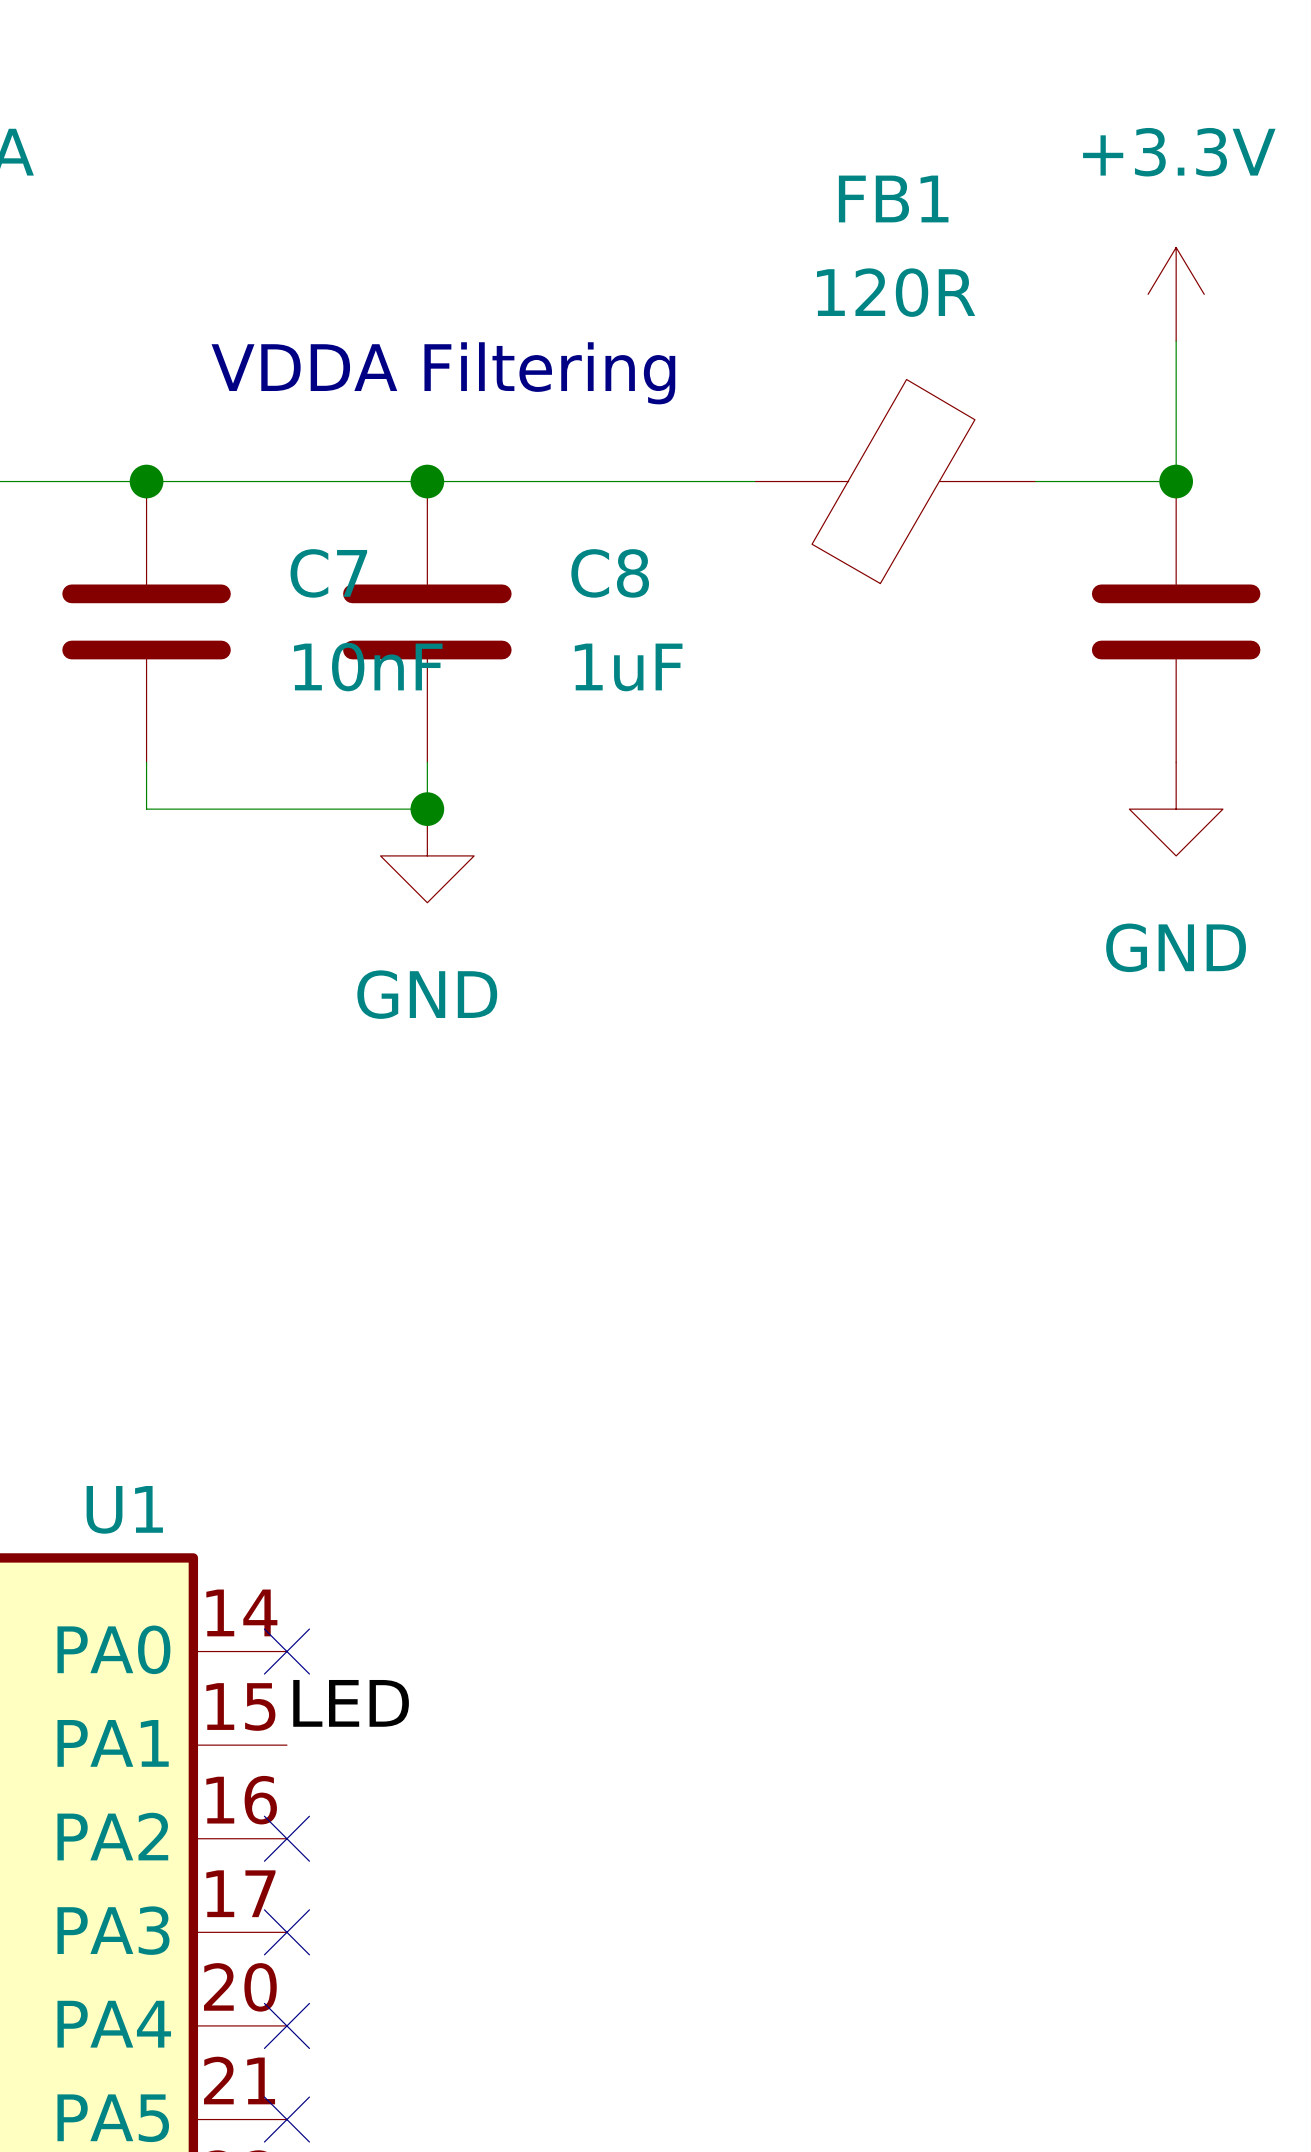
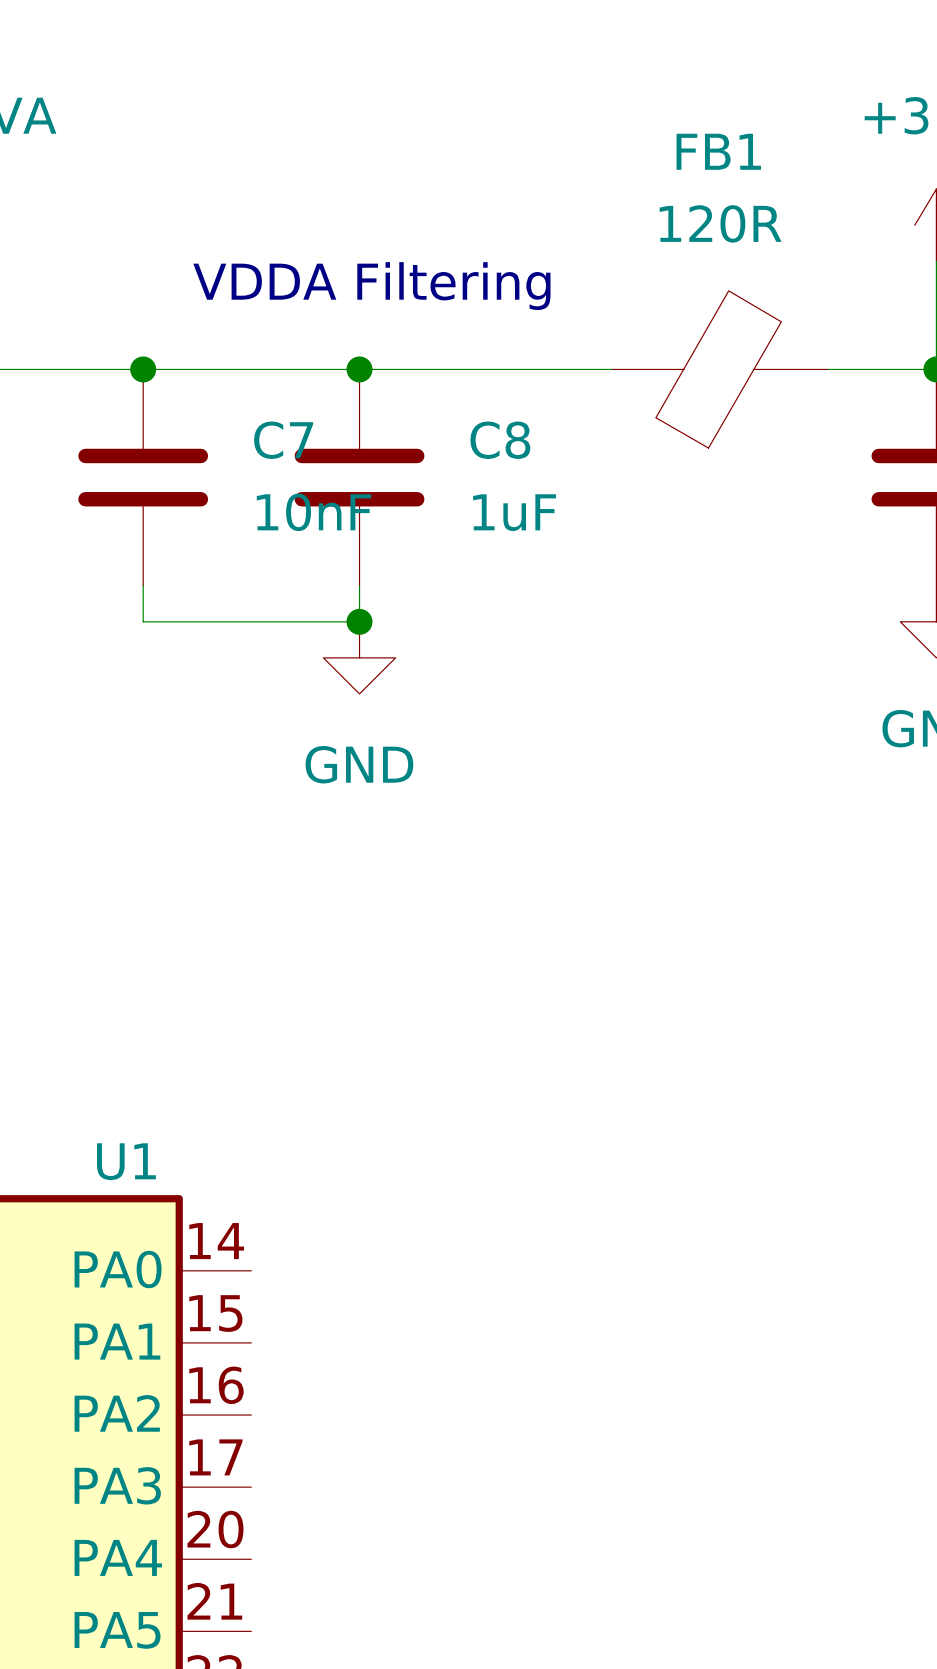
no-connect mark: (286, 1651) -> none
label: LED (351, 1703) -> none
no-connect mark: (286, 1838) -> none
no-connect mark: (286, 1932) -> none
no-connect mark: (286, 2025) -> none
no-connect mark: (286, 2119) -> none

